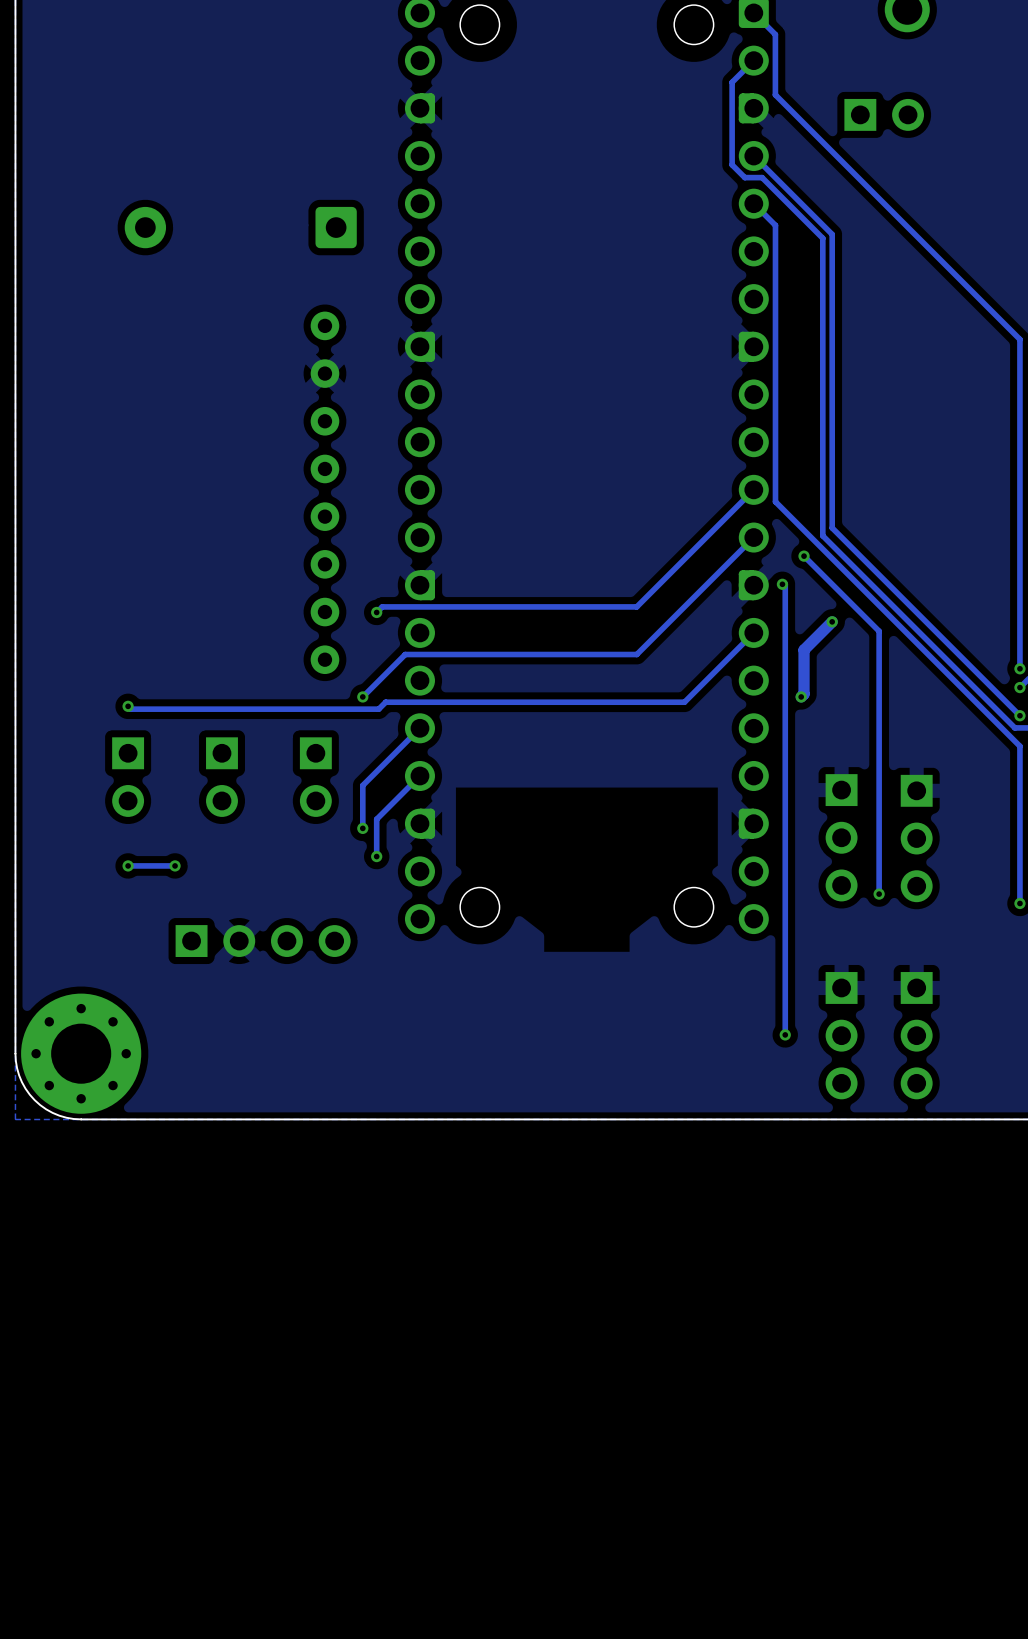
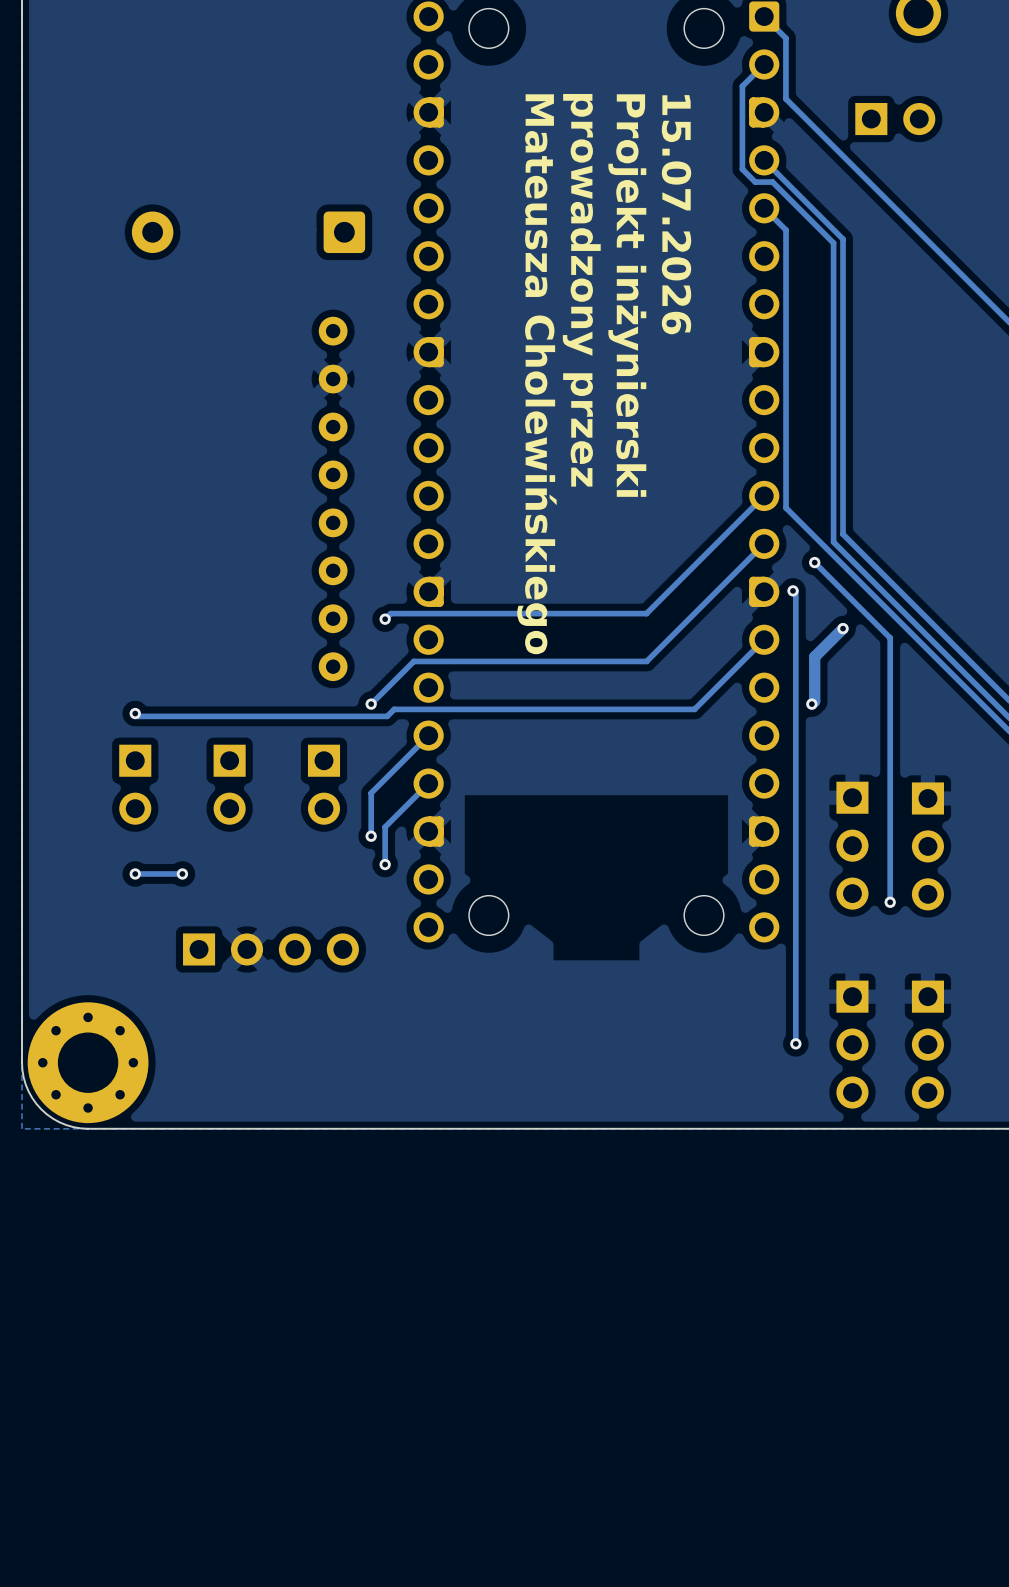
text: none -> 15.07.2026 (676, 214)
text: none -> prowadzony przez (581, 290)
text: none -> Projekt inżynierski (627, 295)
text: none -> Mateusza Cholewińskiego (536, 374)

